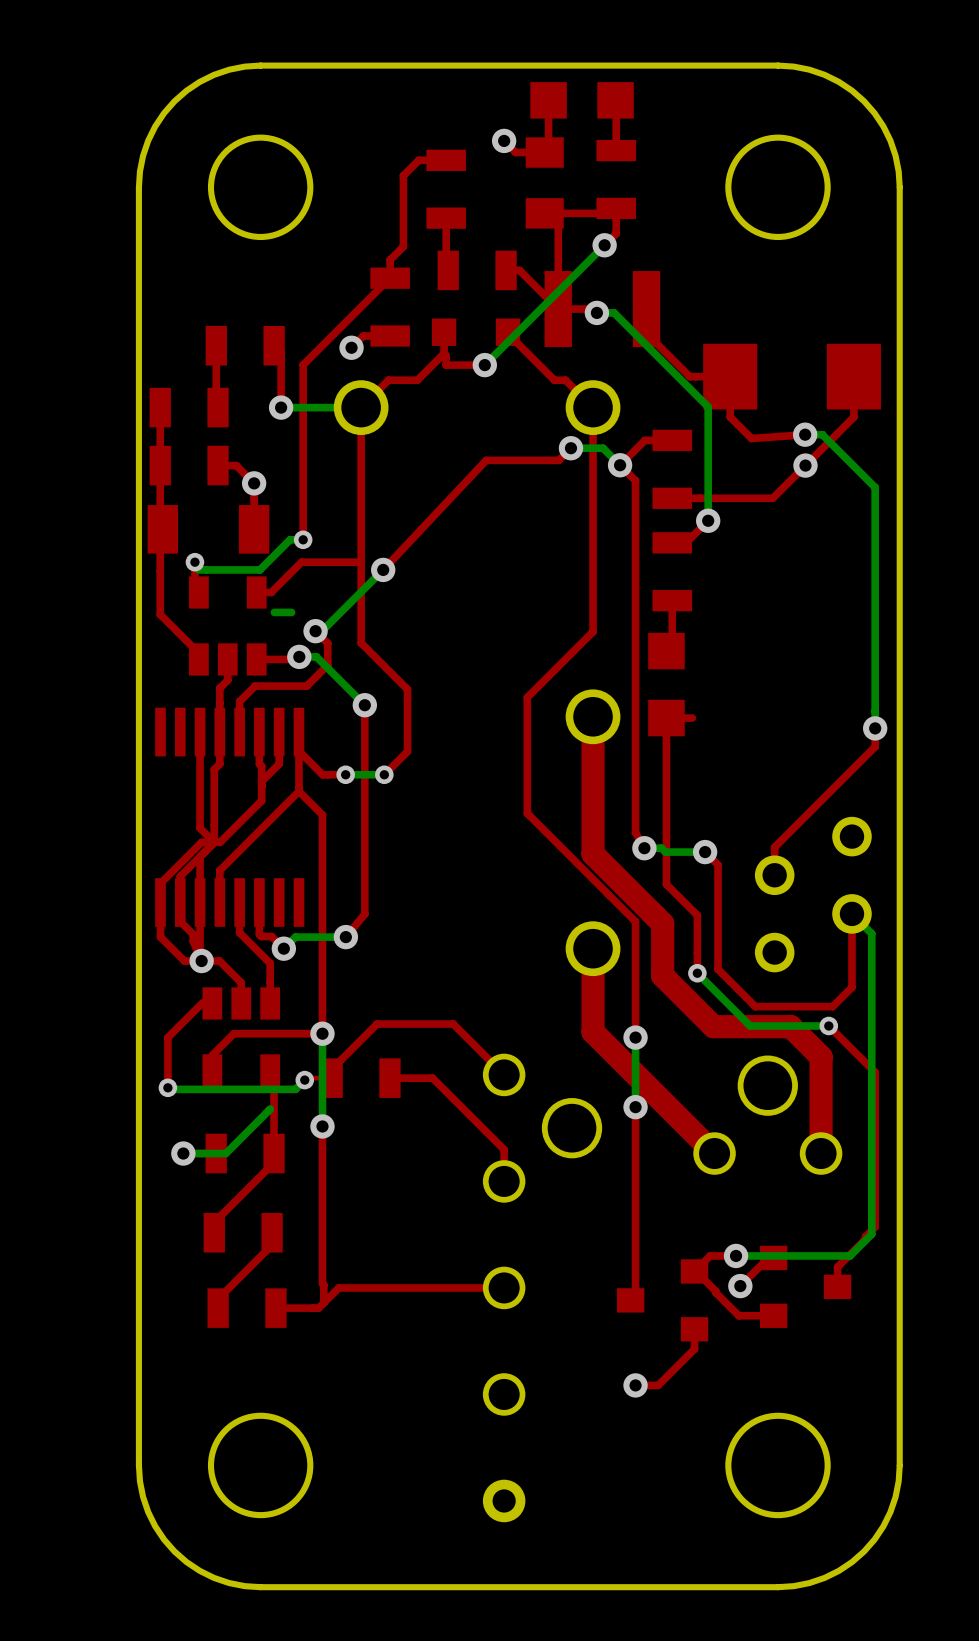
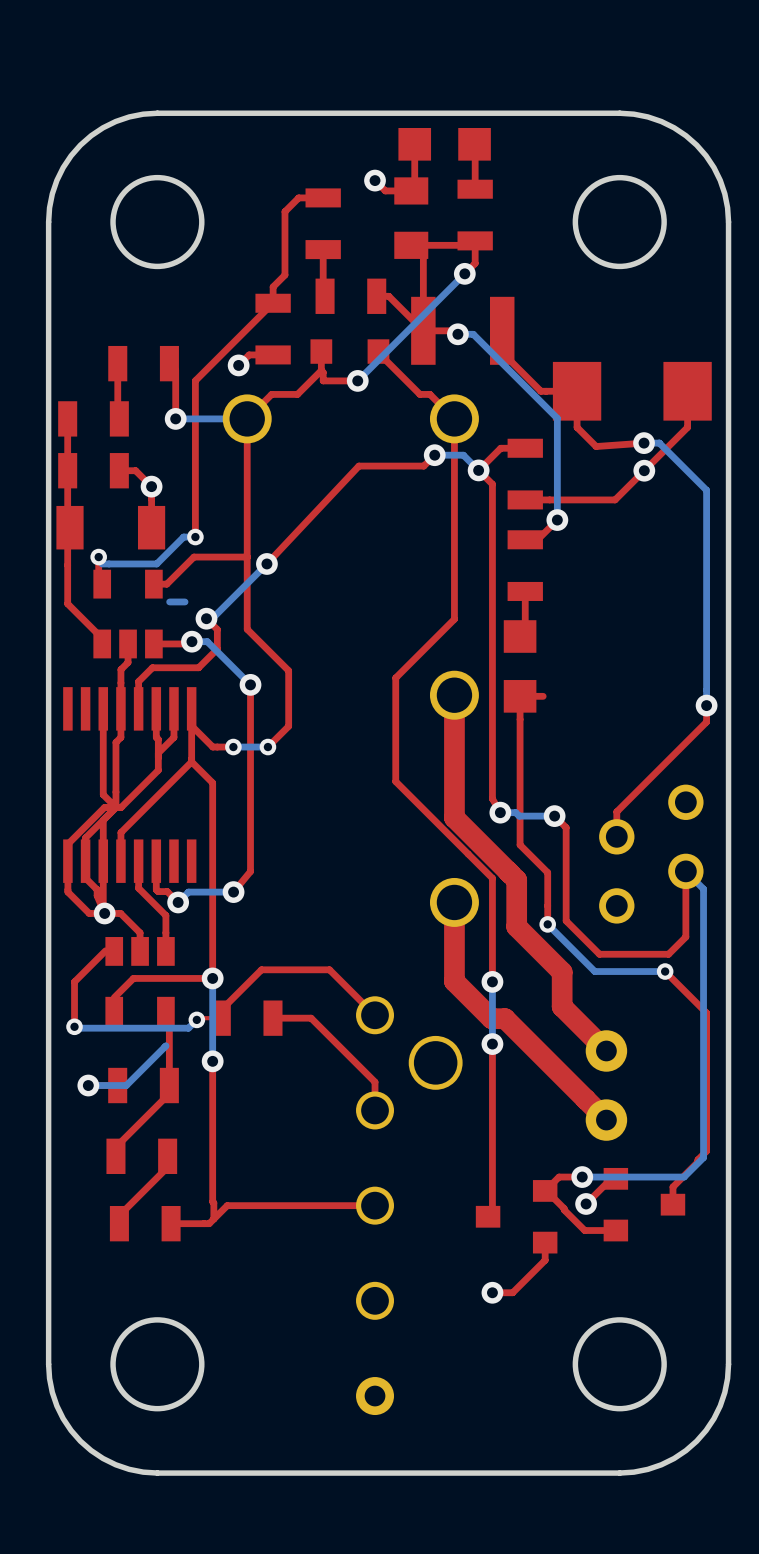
top track: (713, 1026) (790, 1026) (821, 1056) -> (562, 972) (562, 1006) (606, 1050)
top track: (593, 1032) (714, 1153) -> (454, 976) (454, 981) (491, 1018) (505, 1018) (606, 1120)
top track: (821, 1056) (821, 1153) -> none
part: (767, 1115) -> none
part: none -> (606, 1085)

